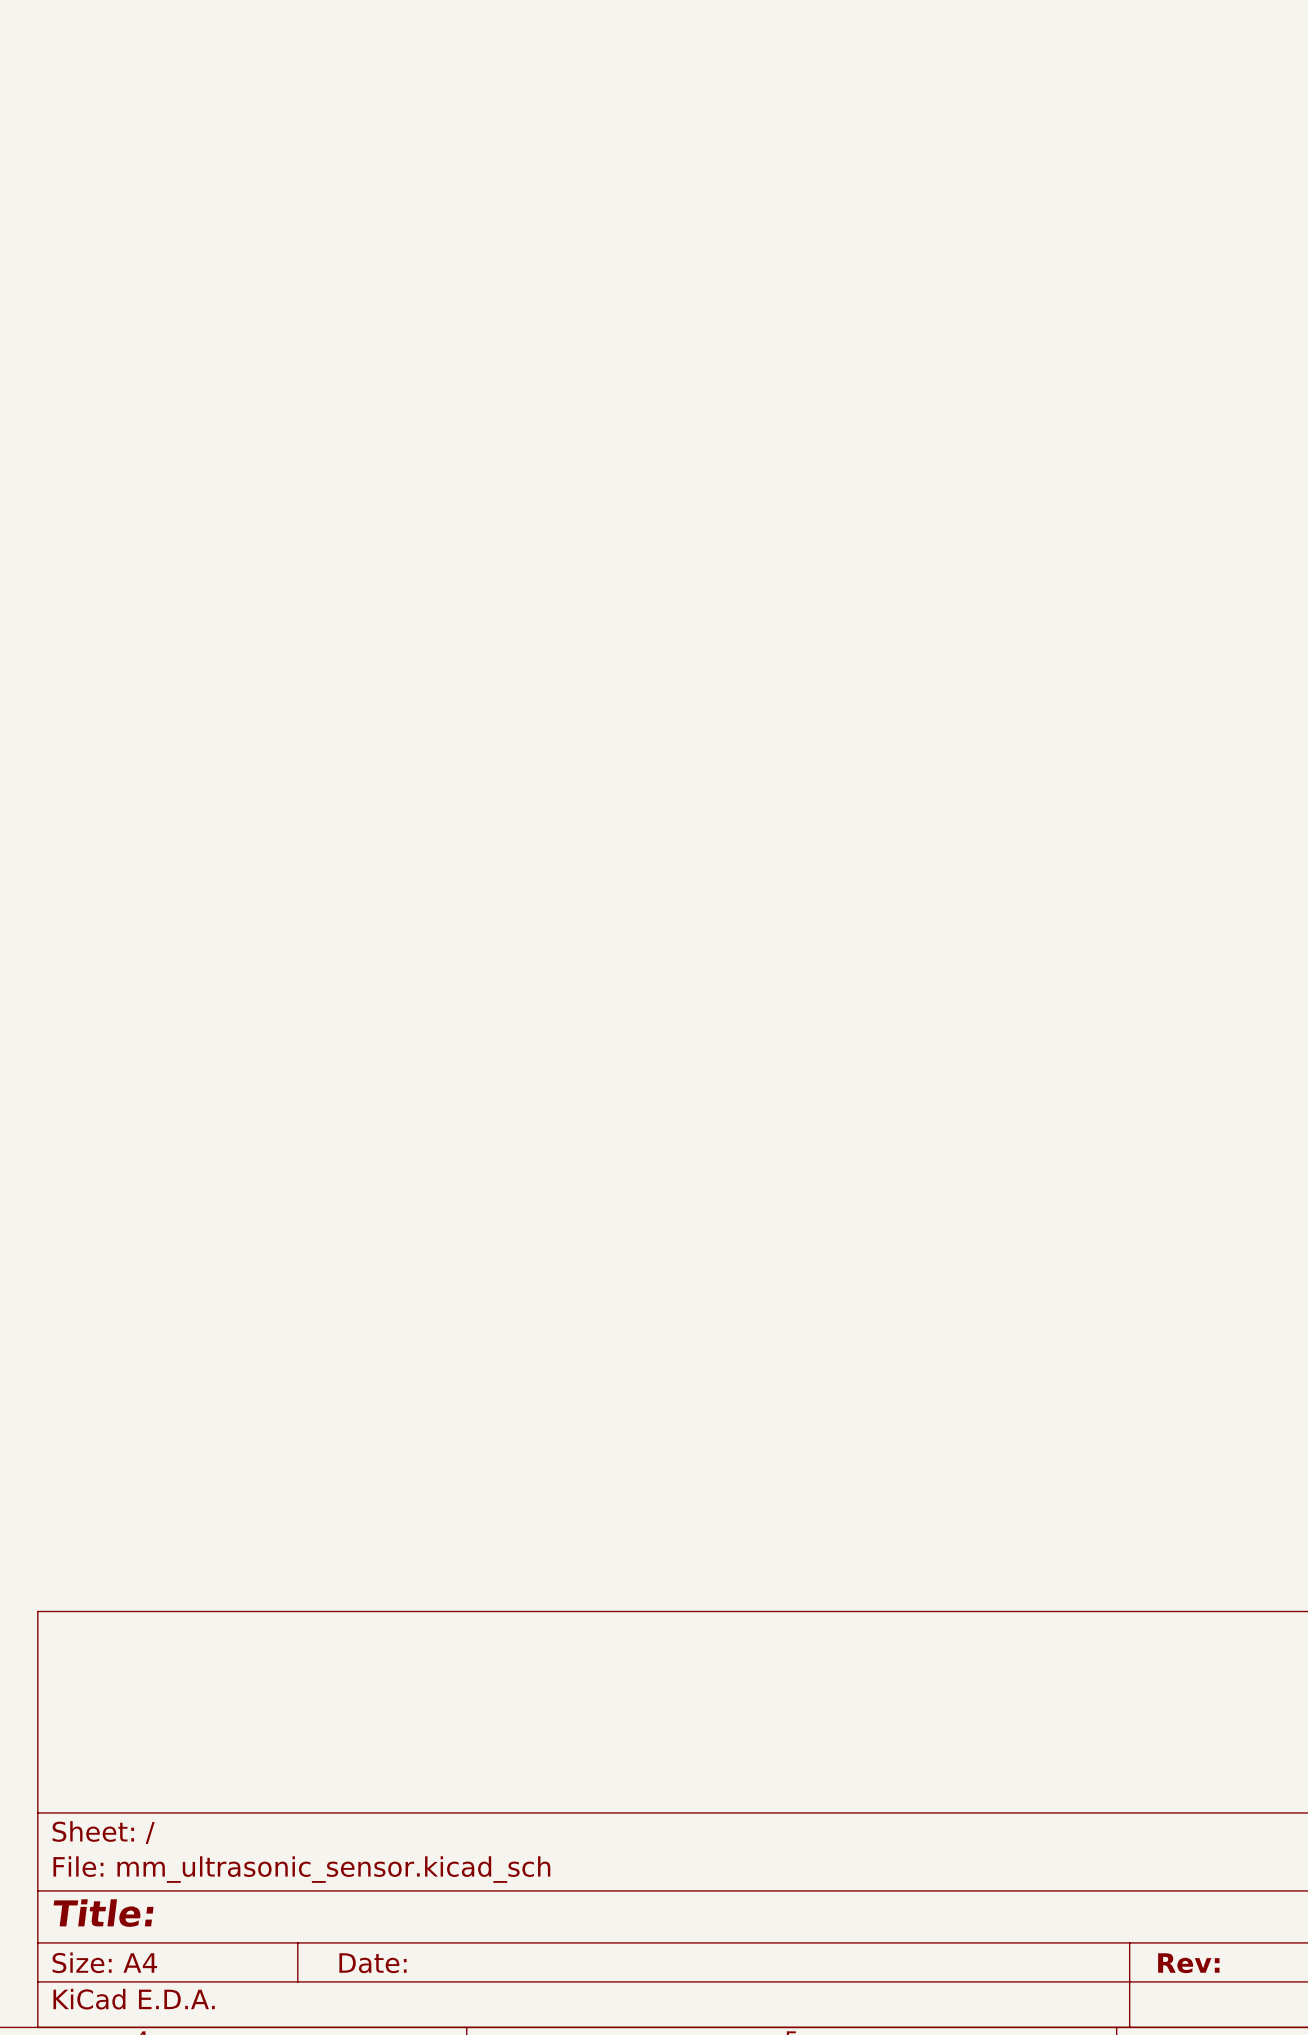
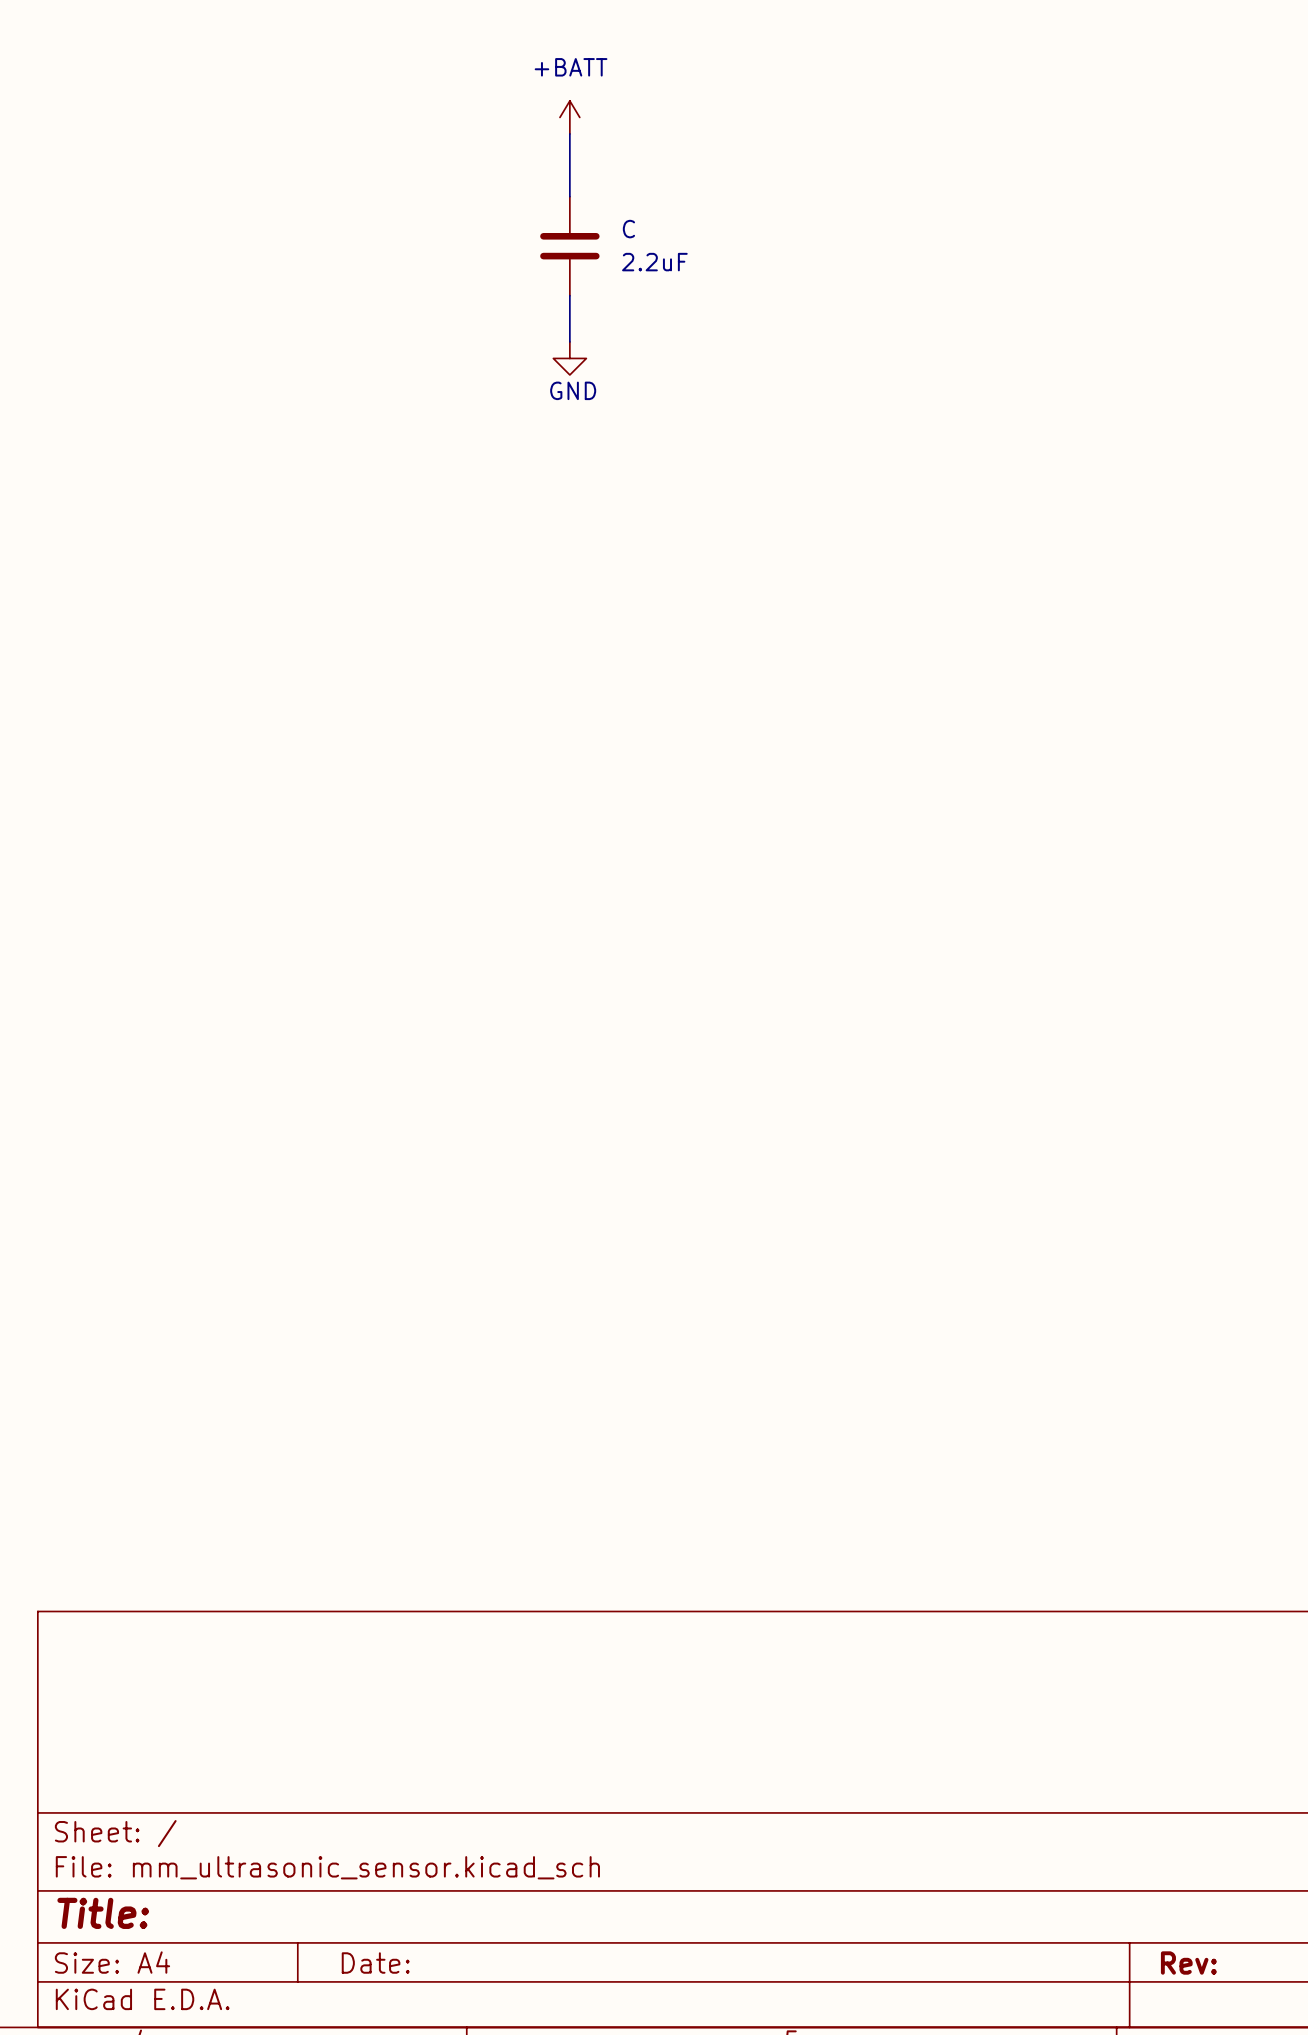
power symbol: none -> +BATT (569, 117)
wire: none -> (569, 133) (569, 196)
C: none -> 2.2uF (569, 246)
wire: none -> (569, 295) (569, 341)
power symbol: none -> GND (569, 358)

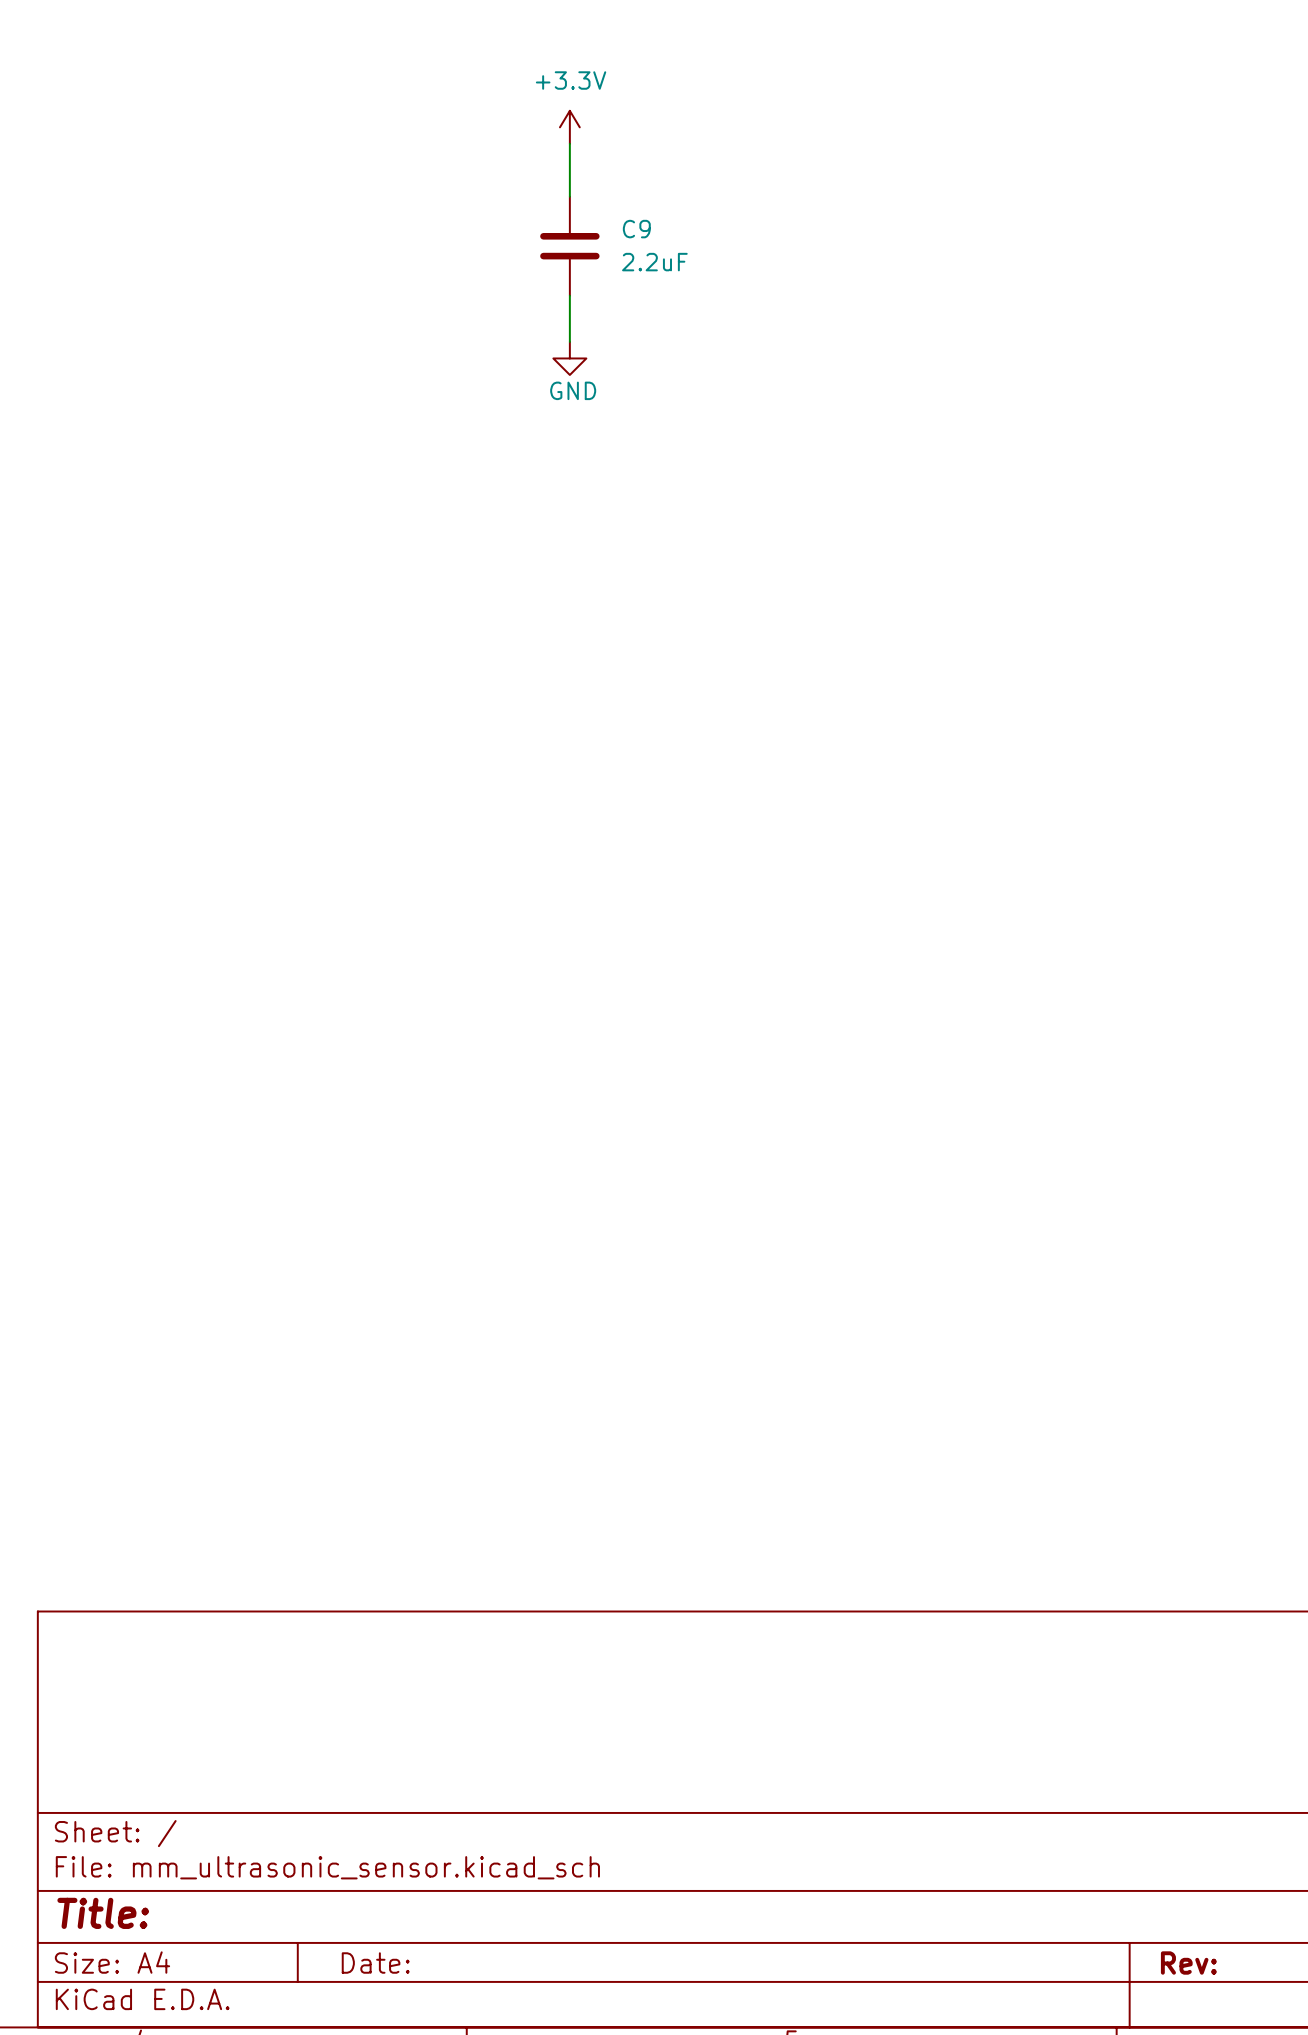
power symbol: +BATT (569, 117) -> +3.3V (569, 127)
C name: C (628, 229) -> C9 (636, 229)

